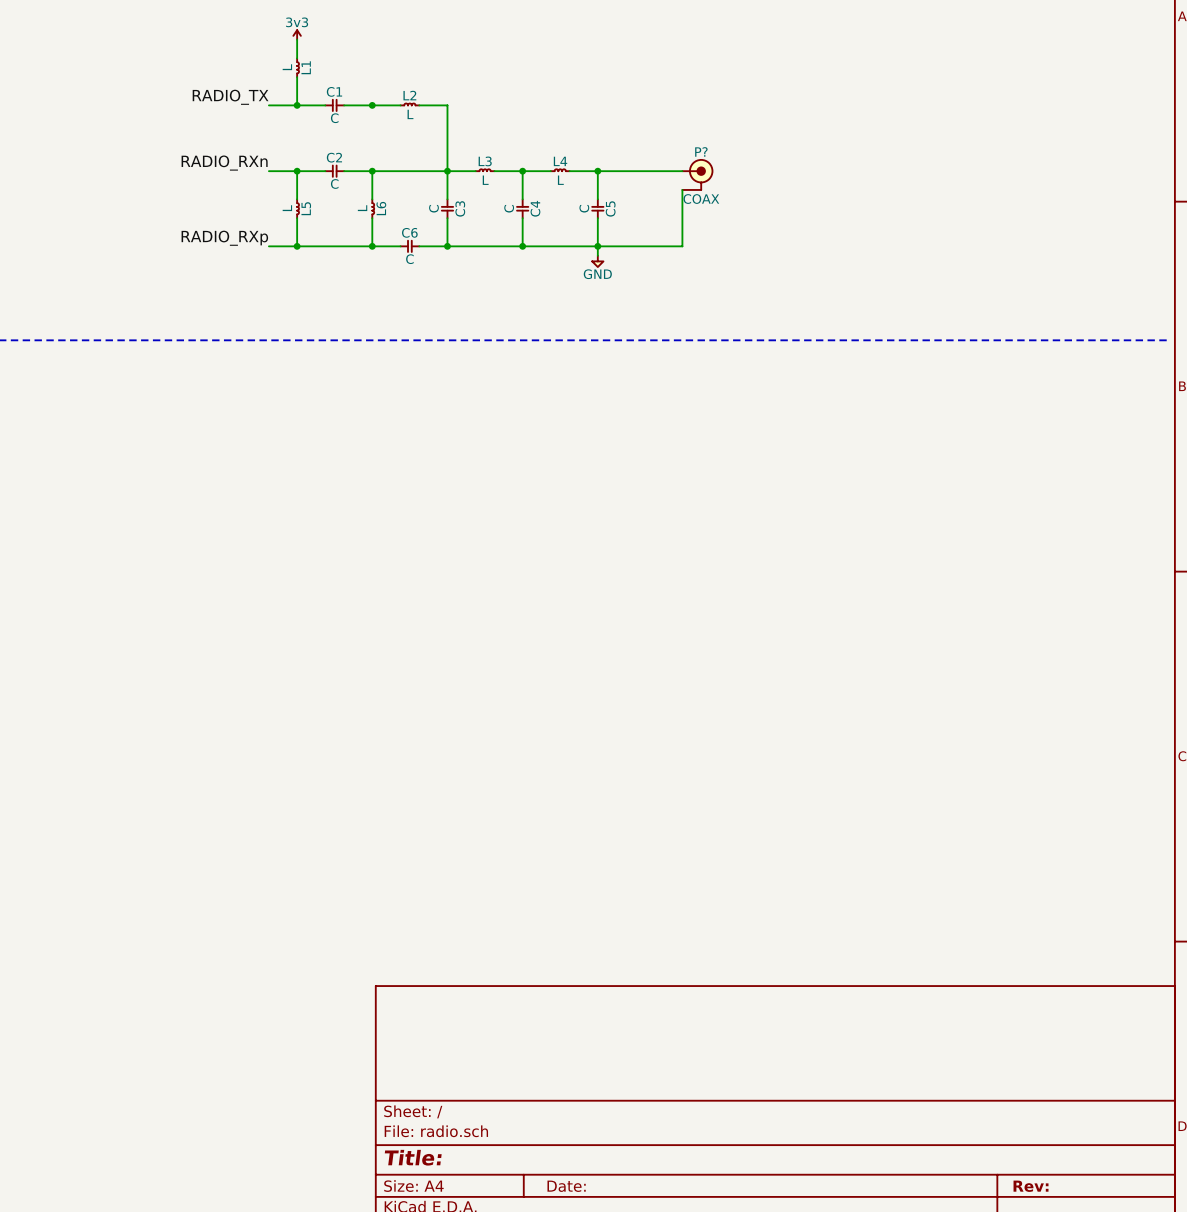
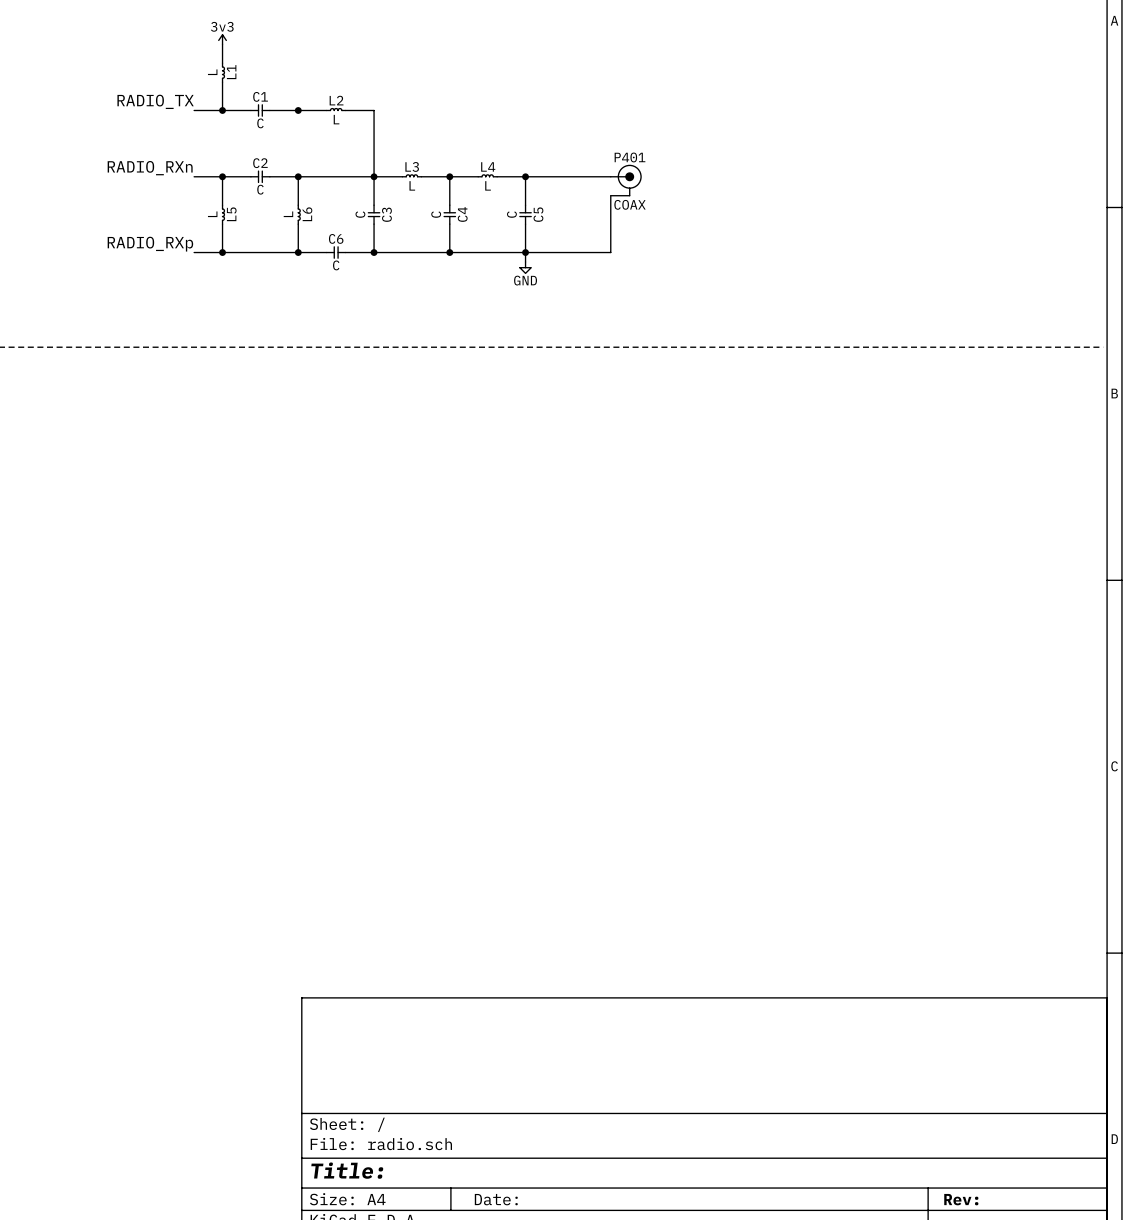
P? name: P? (701, 151) -> P401 (630, 157)

